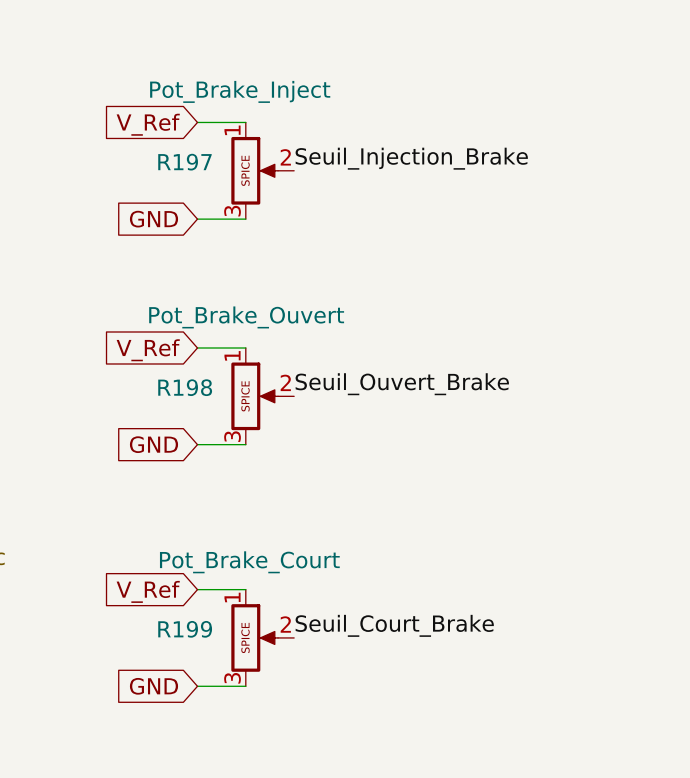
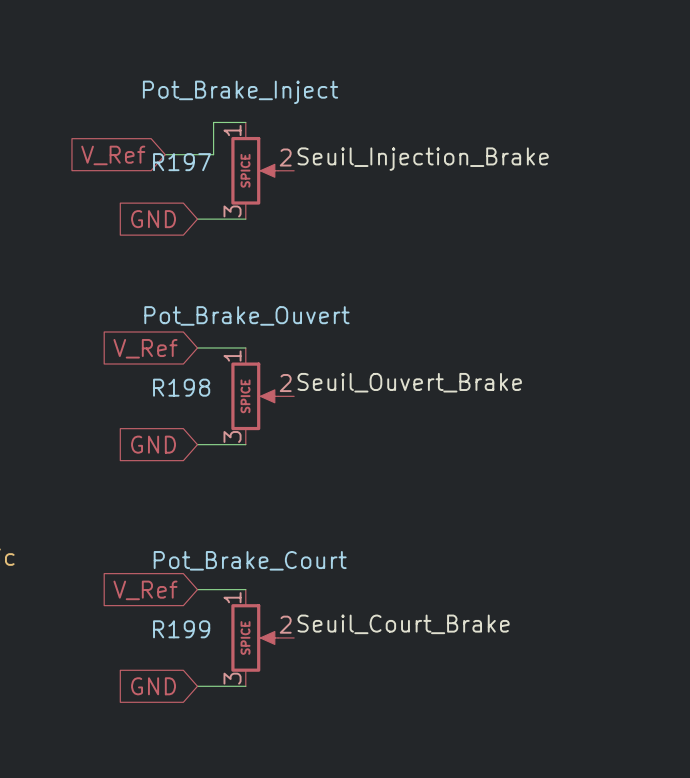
wire: (197, 122) (213, 122) -> (165, 154) (213, 154) (213, 122)
global label position: V_Ref (148, 124) -> V_Ref (113, 155)

